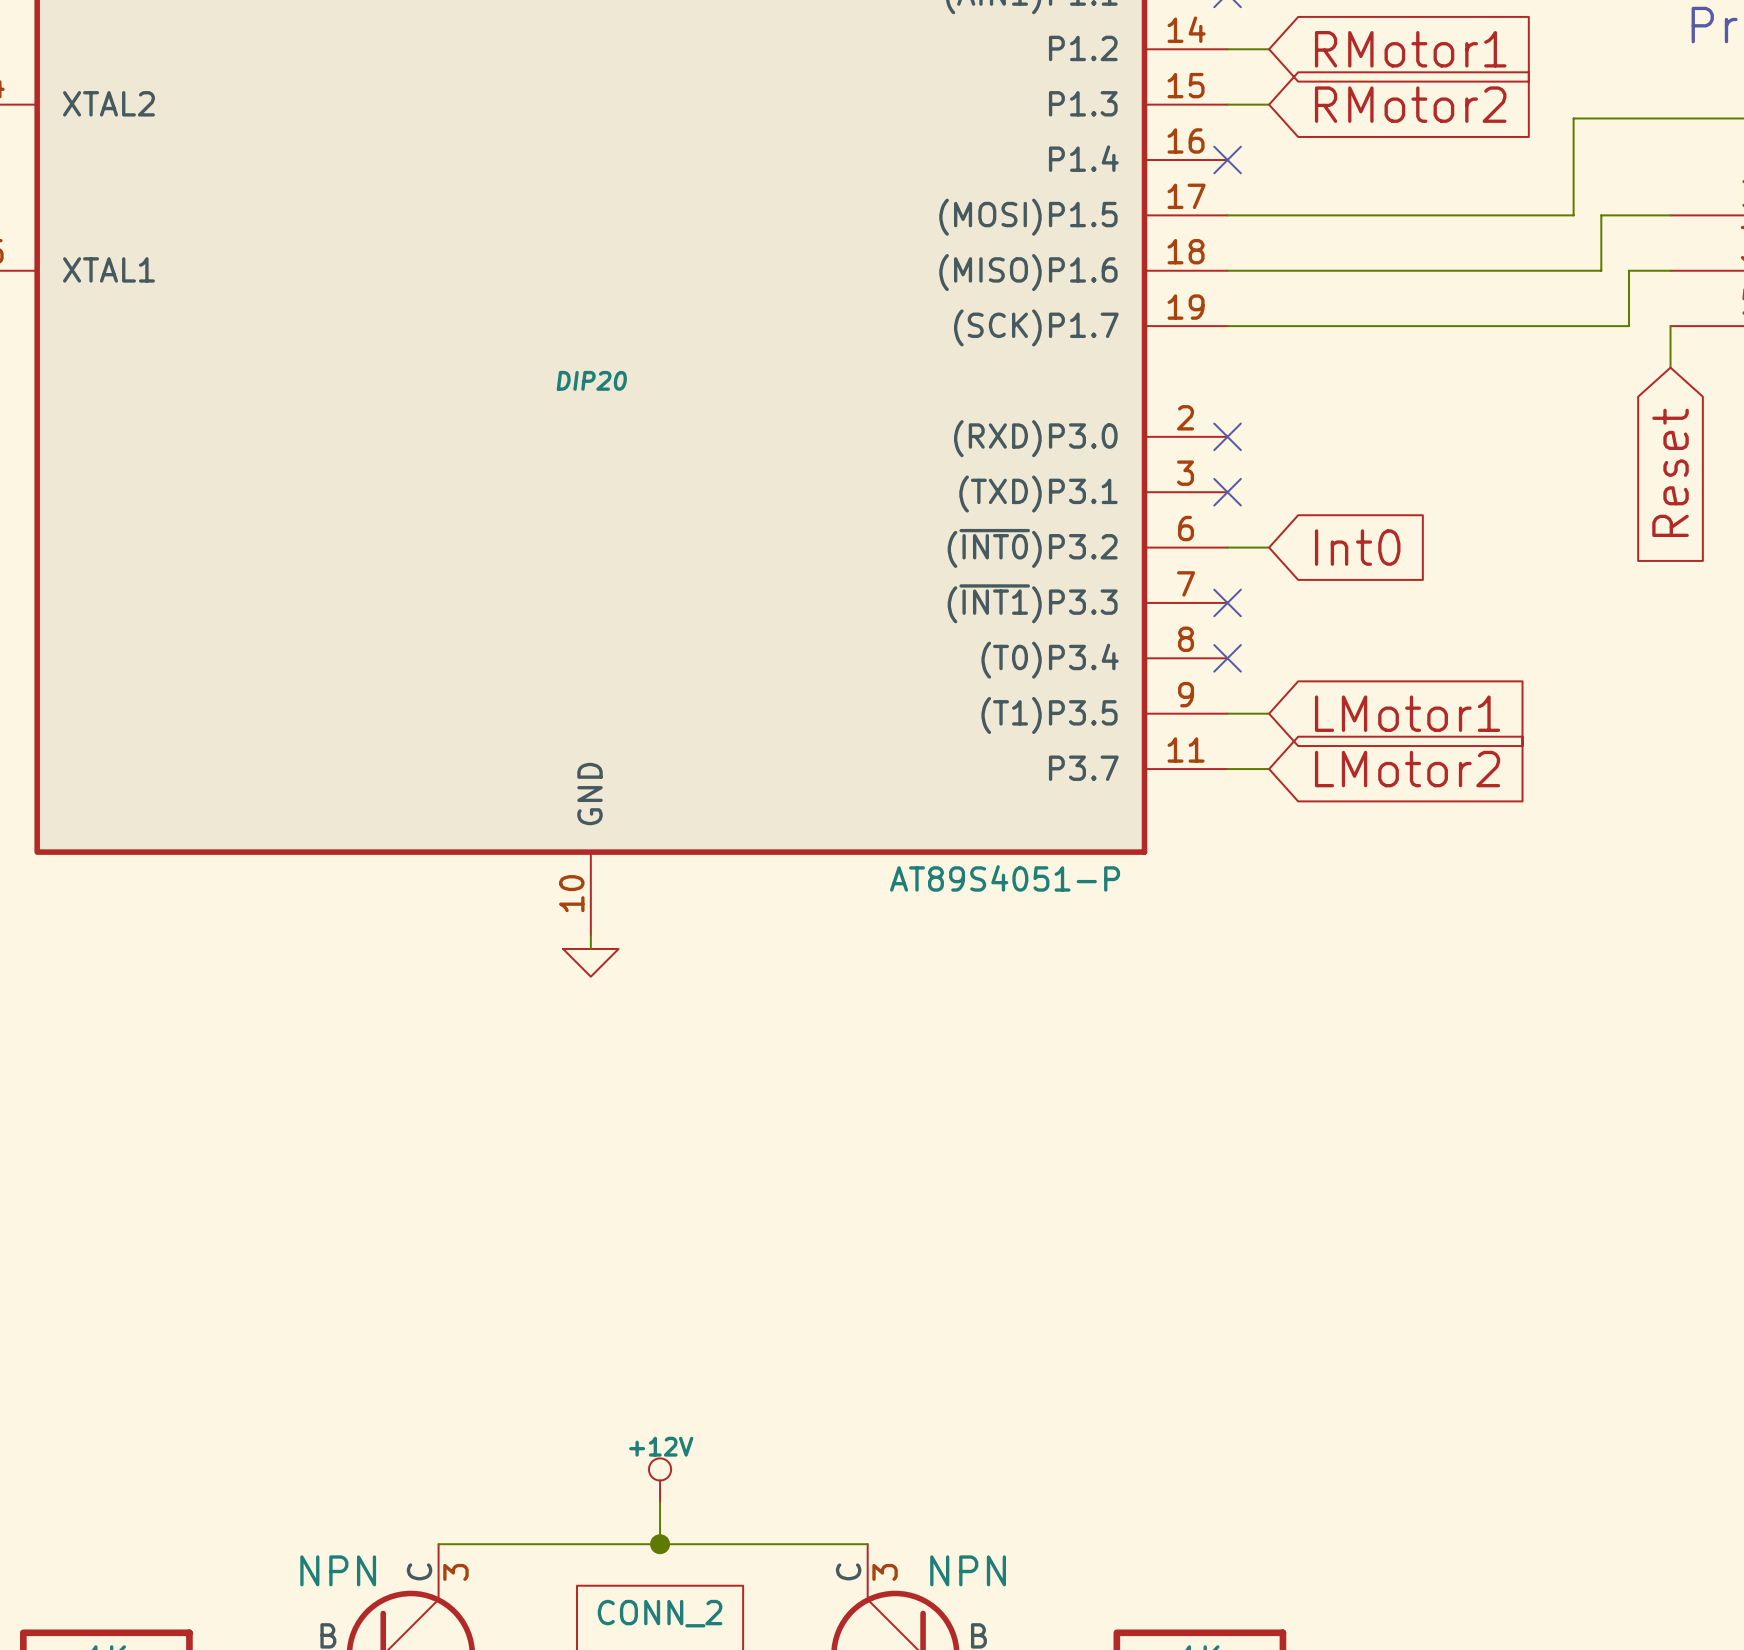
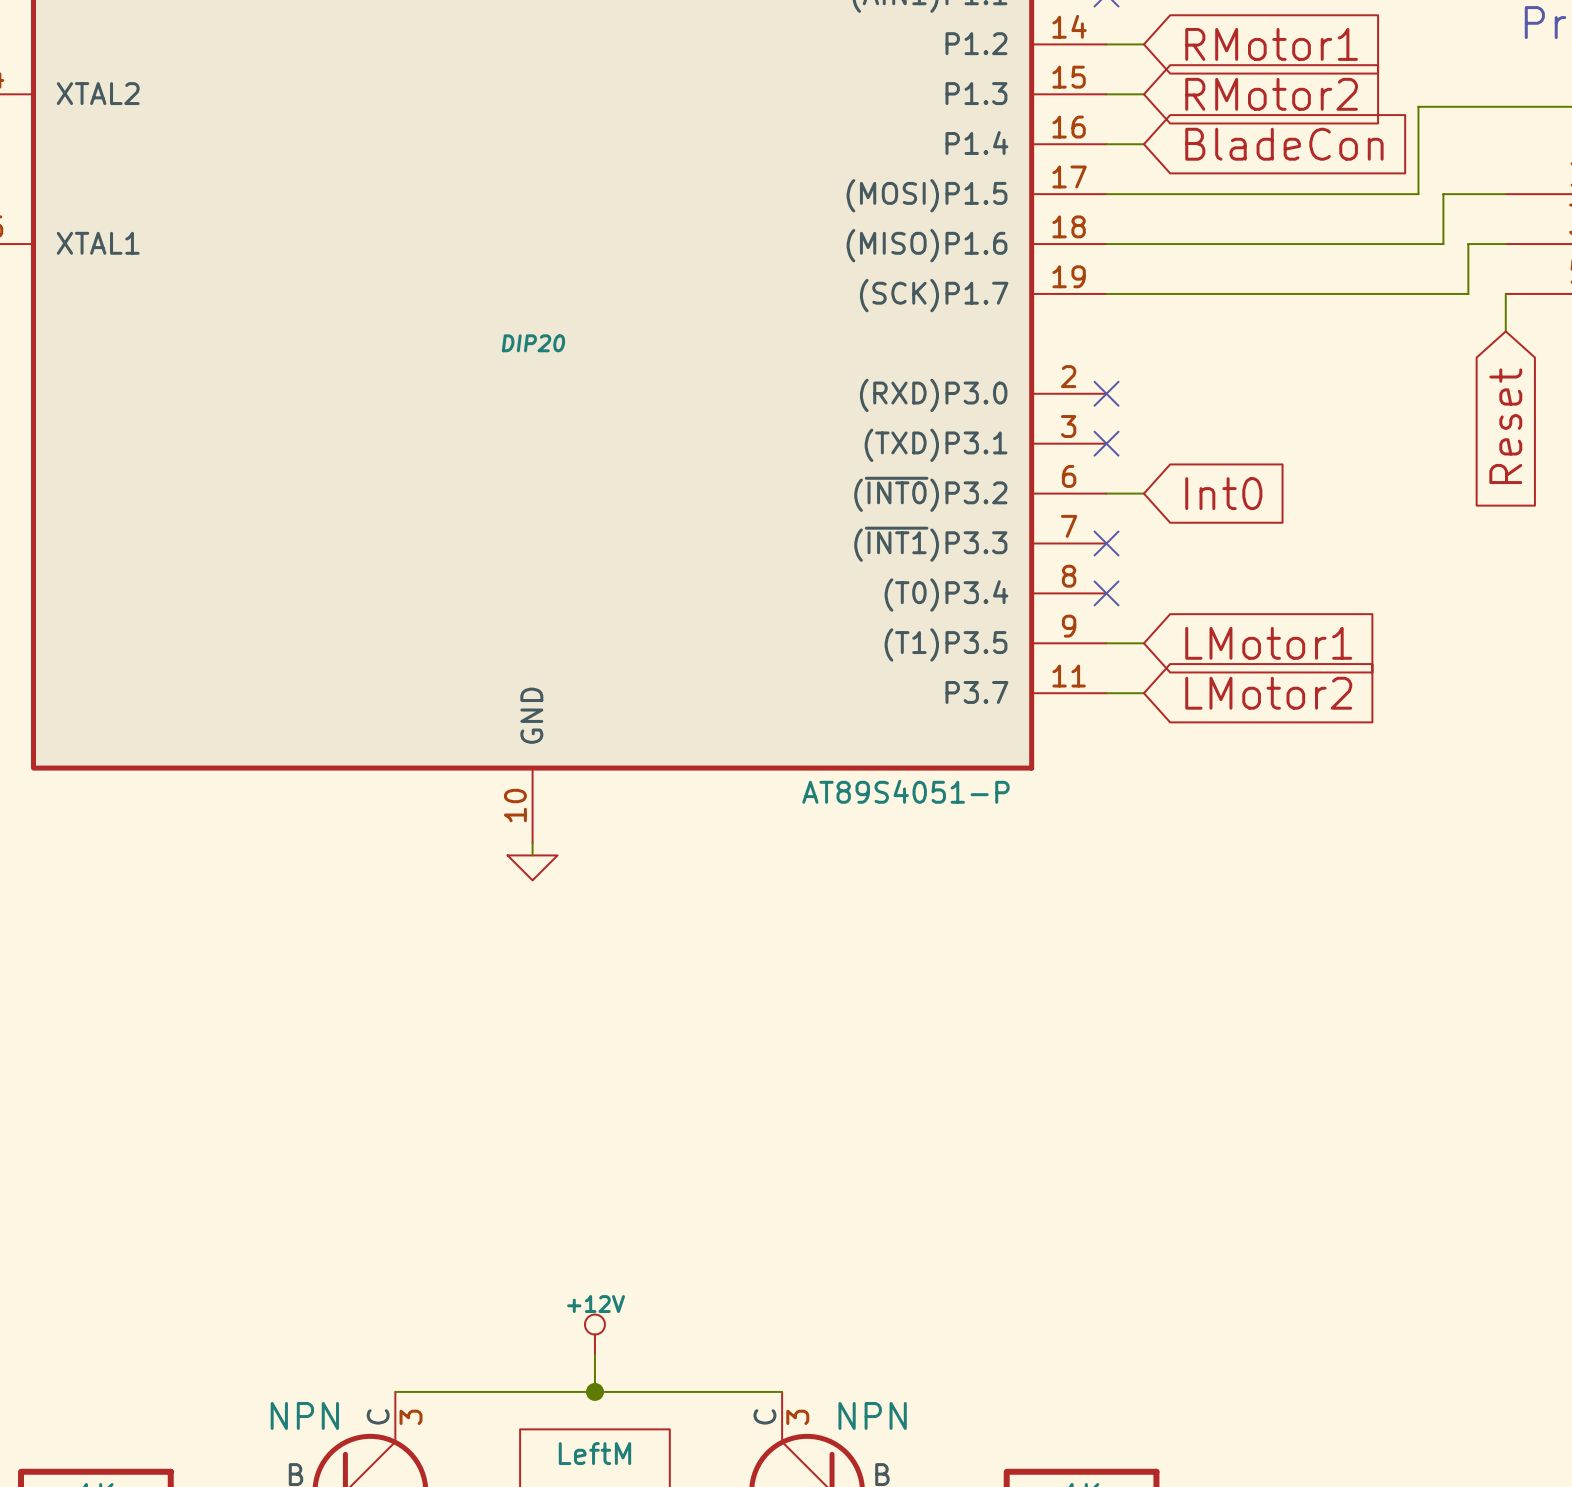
wire: none -> (1106, 144) (1143, 144)
no-connect mark: (1227, 160) -> none
global label: none -> BladeCon (1284, 144)
part value: CONN_2 (660, 1613) -> LeftM (594, 1453)

